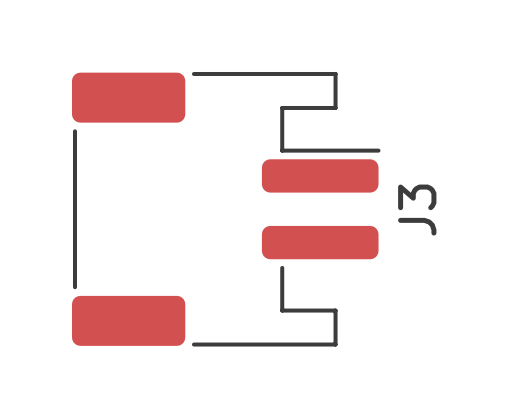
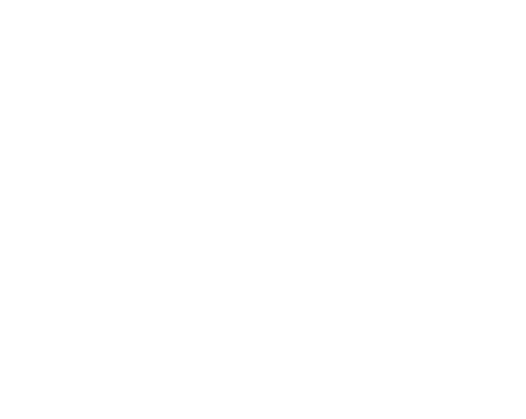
J3: (226, 209) -> none

